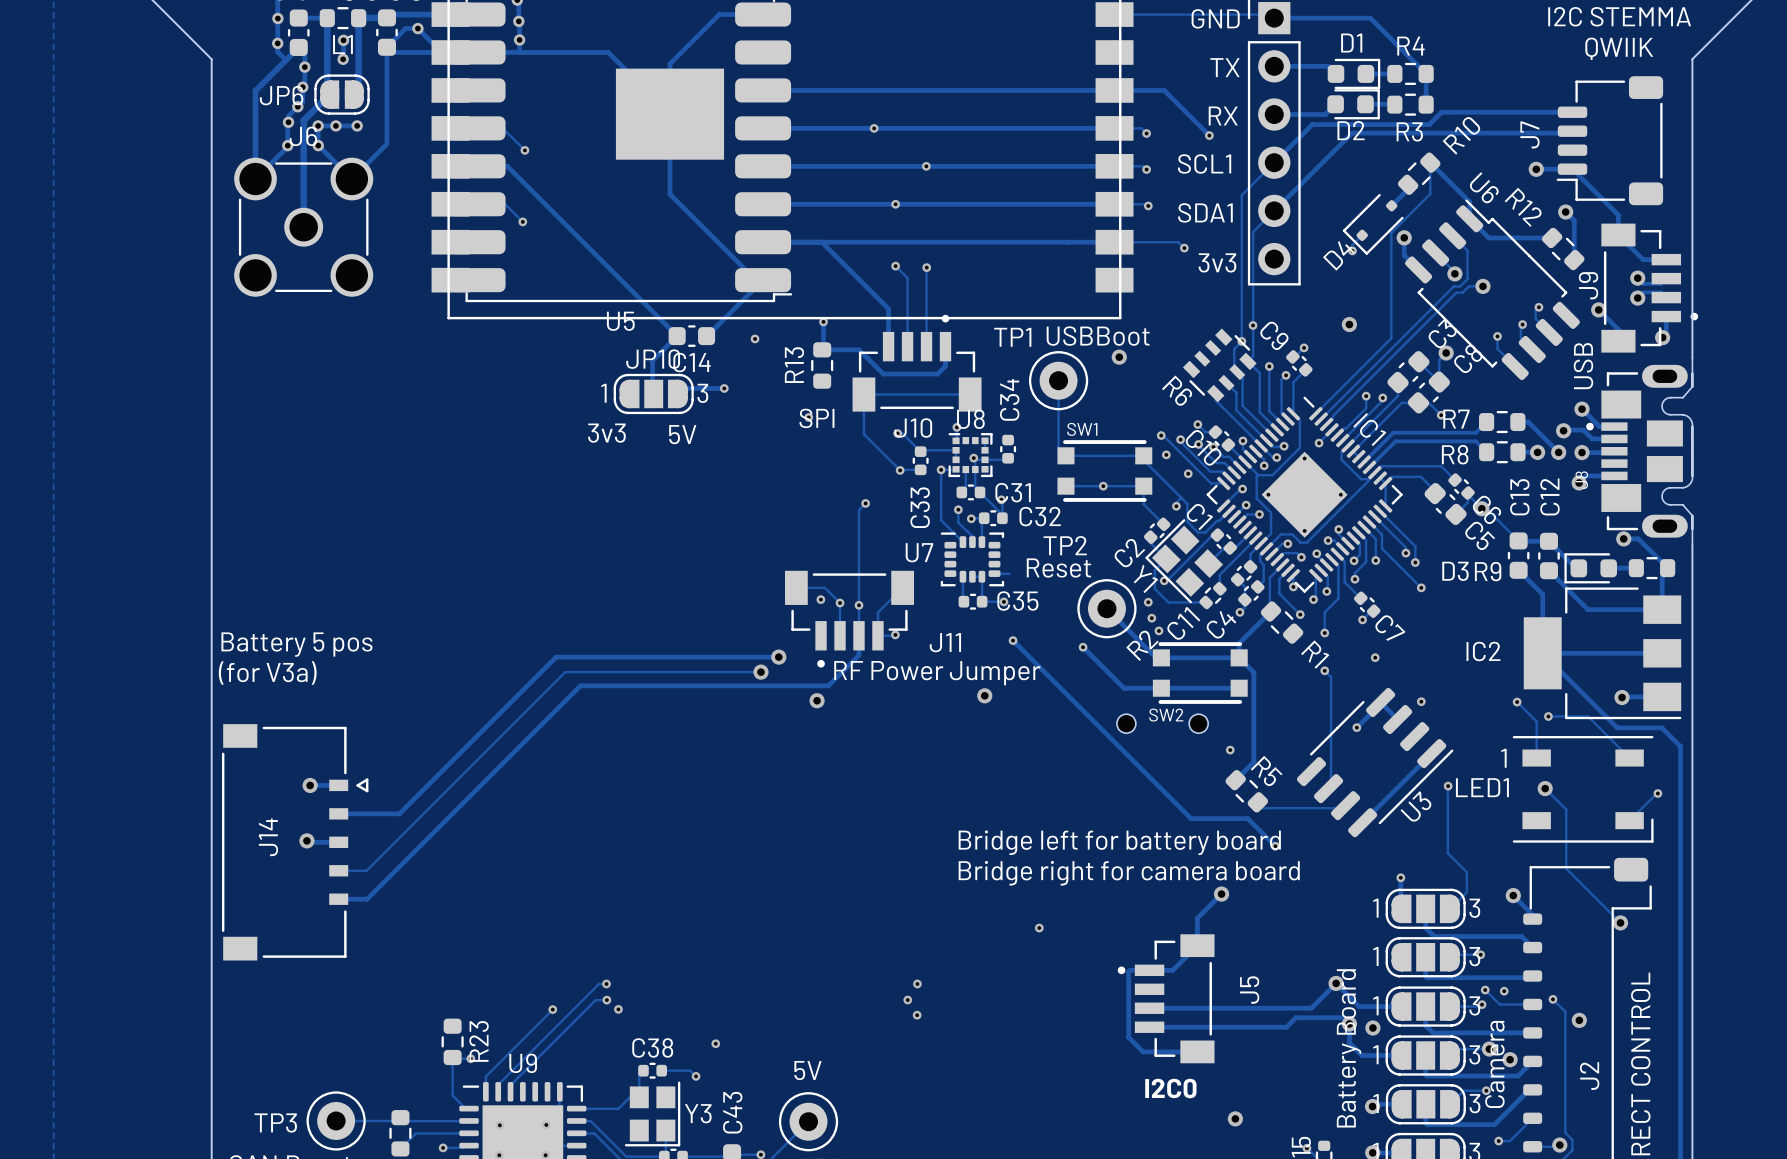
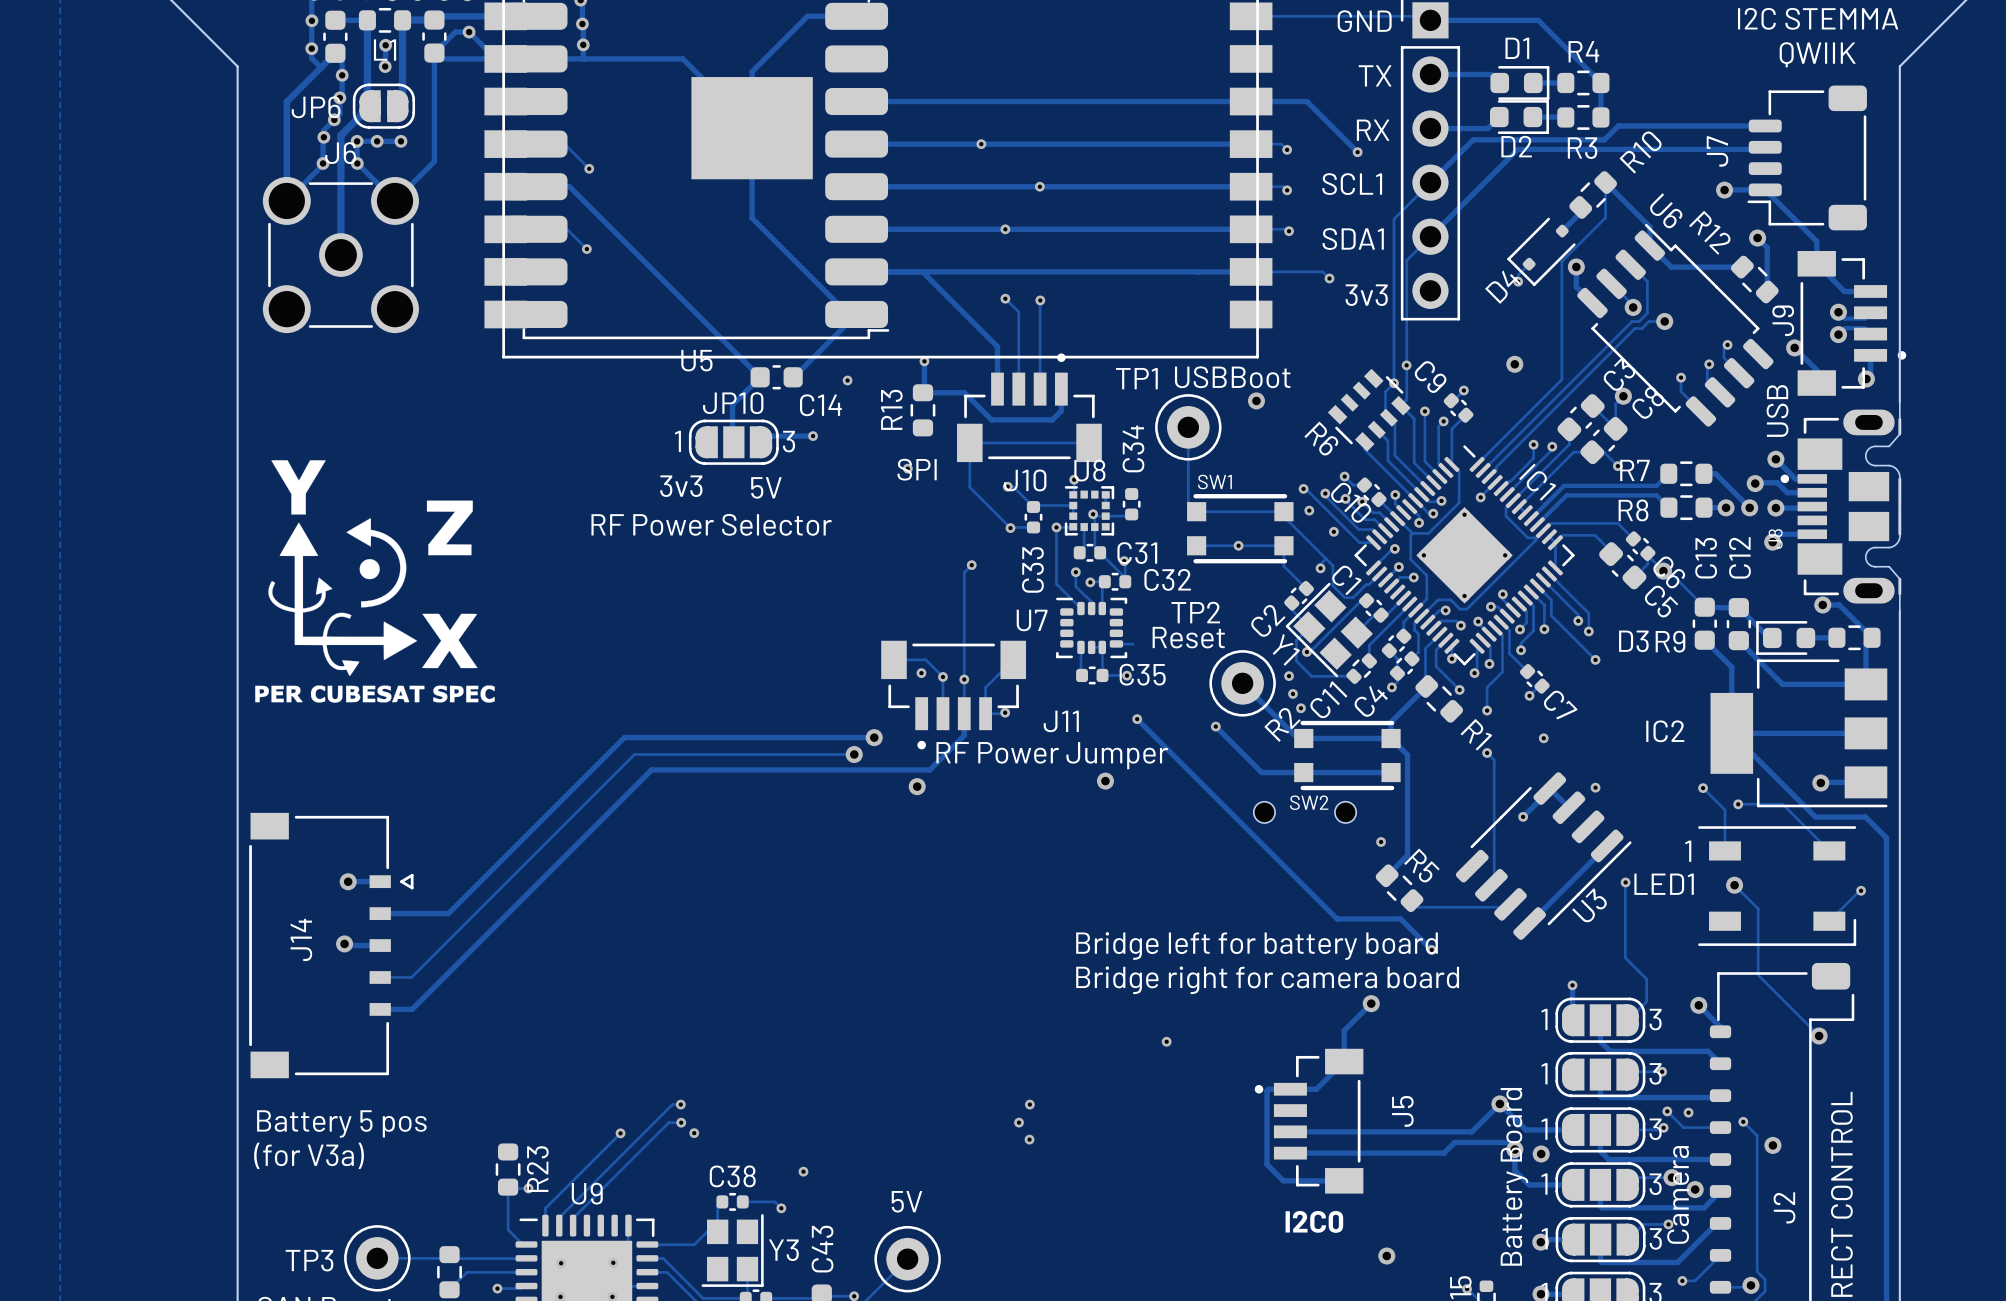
C14 name position: C14 (692, 362) -> C14 (820, 405)
drawing: none -> [255, 460, 495, 703]
text: none -> RF Power Selector (711, 524)
text position: Battery 5 pos (296, 644) -> Battery 5 pos (341, 1123)
text position: (for V3a) (267, 672) -> (for V3a) (309, 1155)

